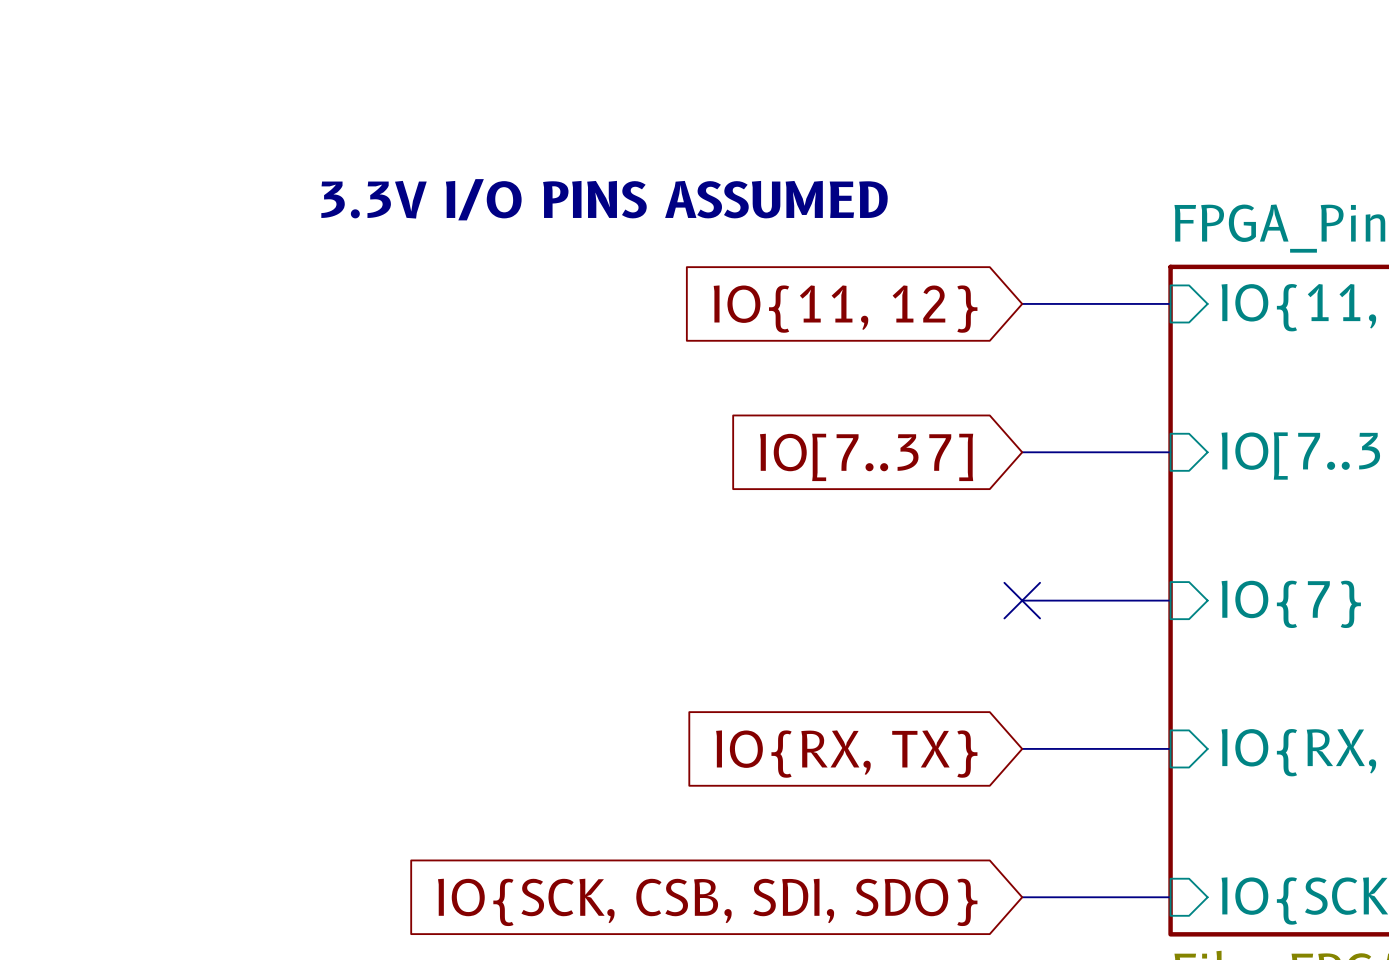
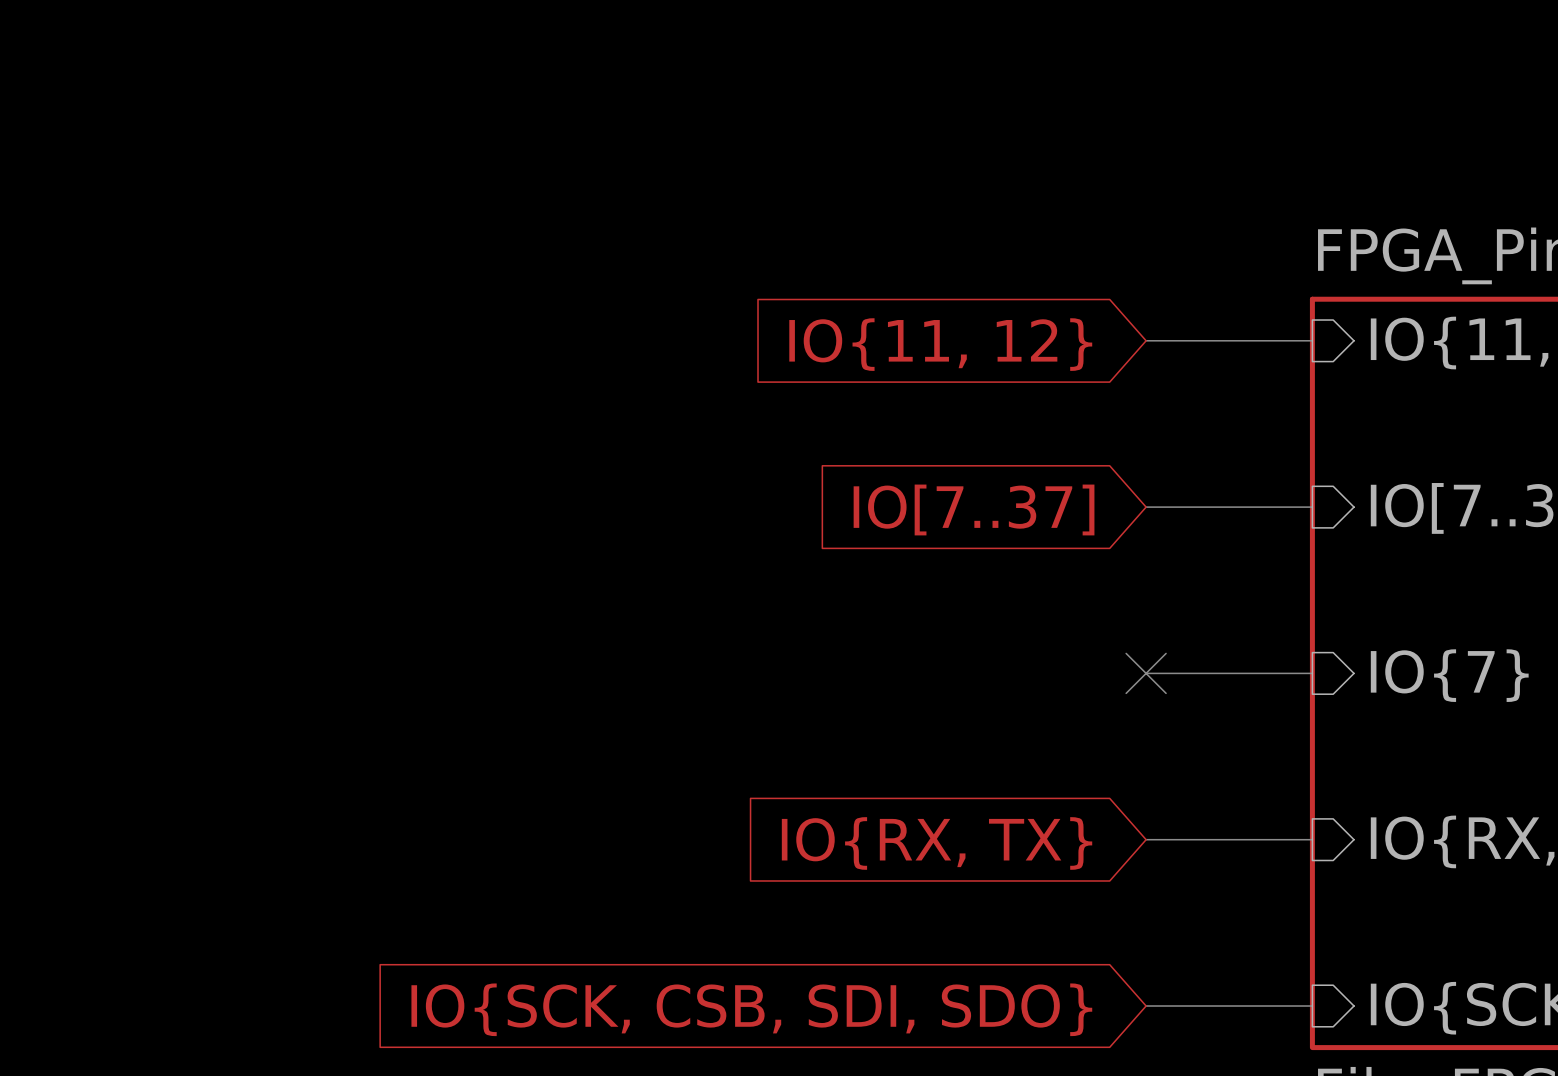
text: 3.3V I/O PINS ASSUMED (604, 199) -> none

